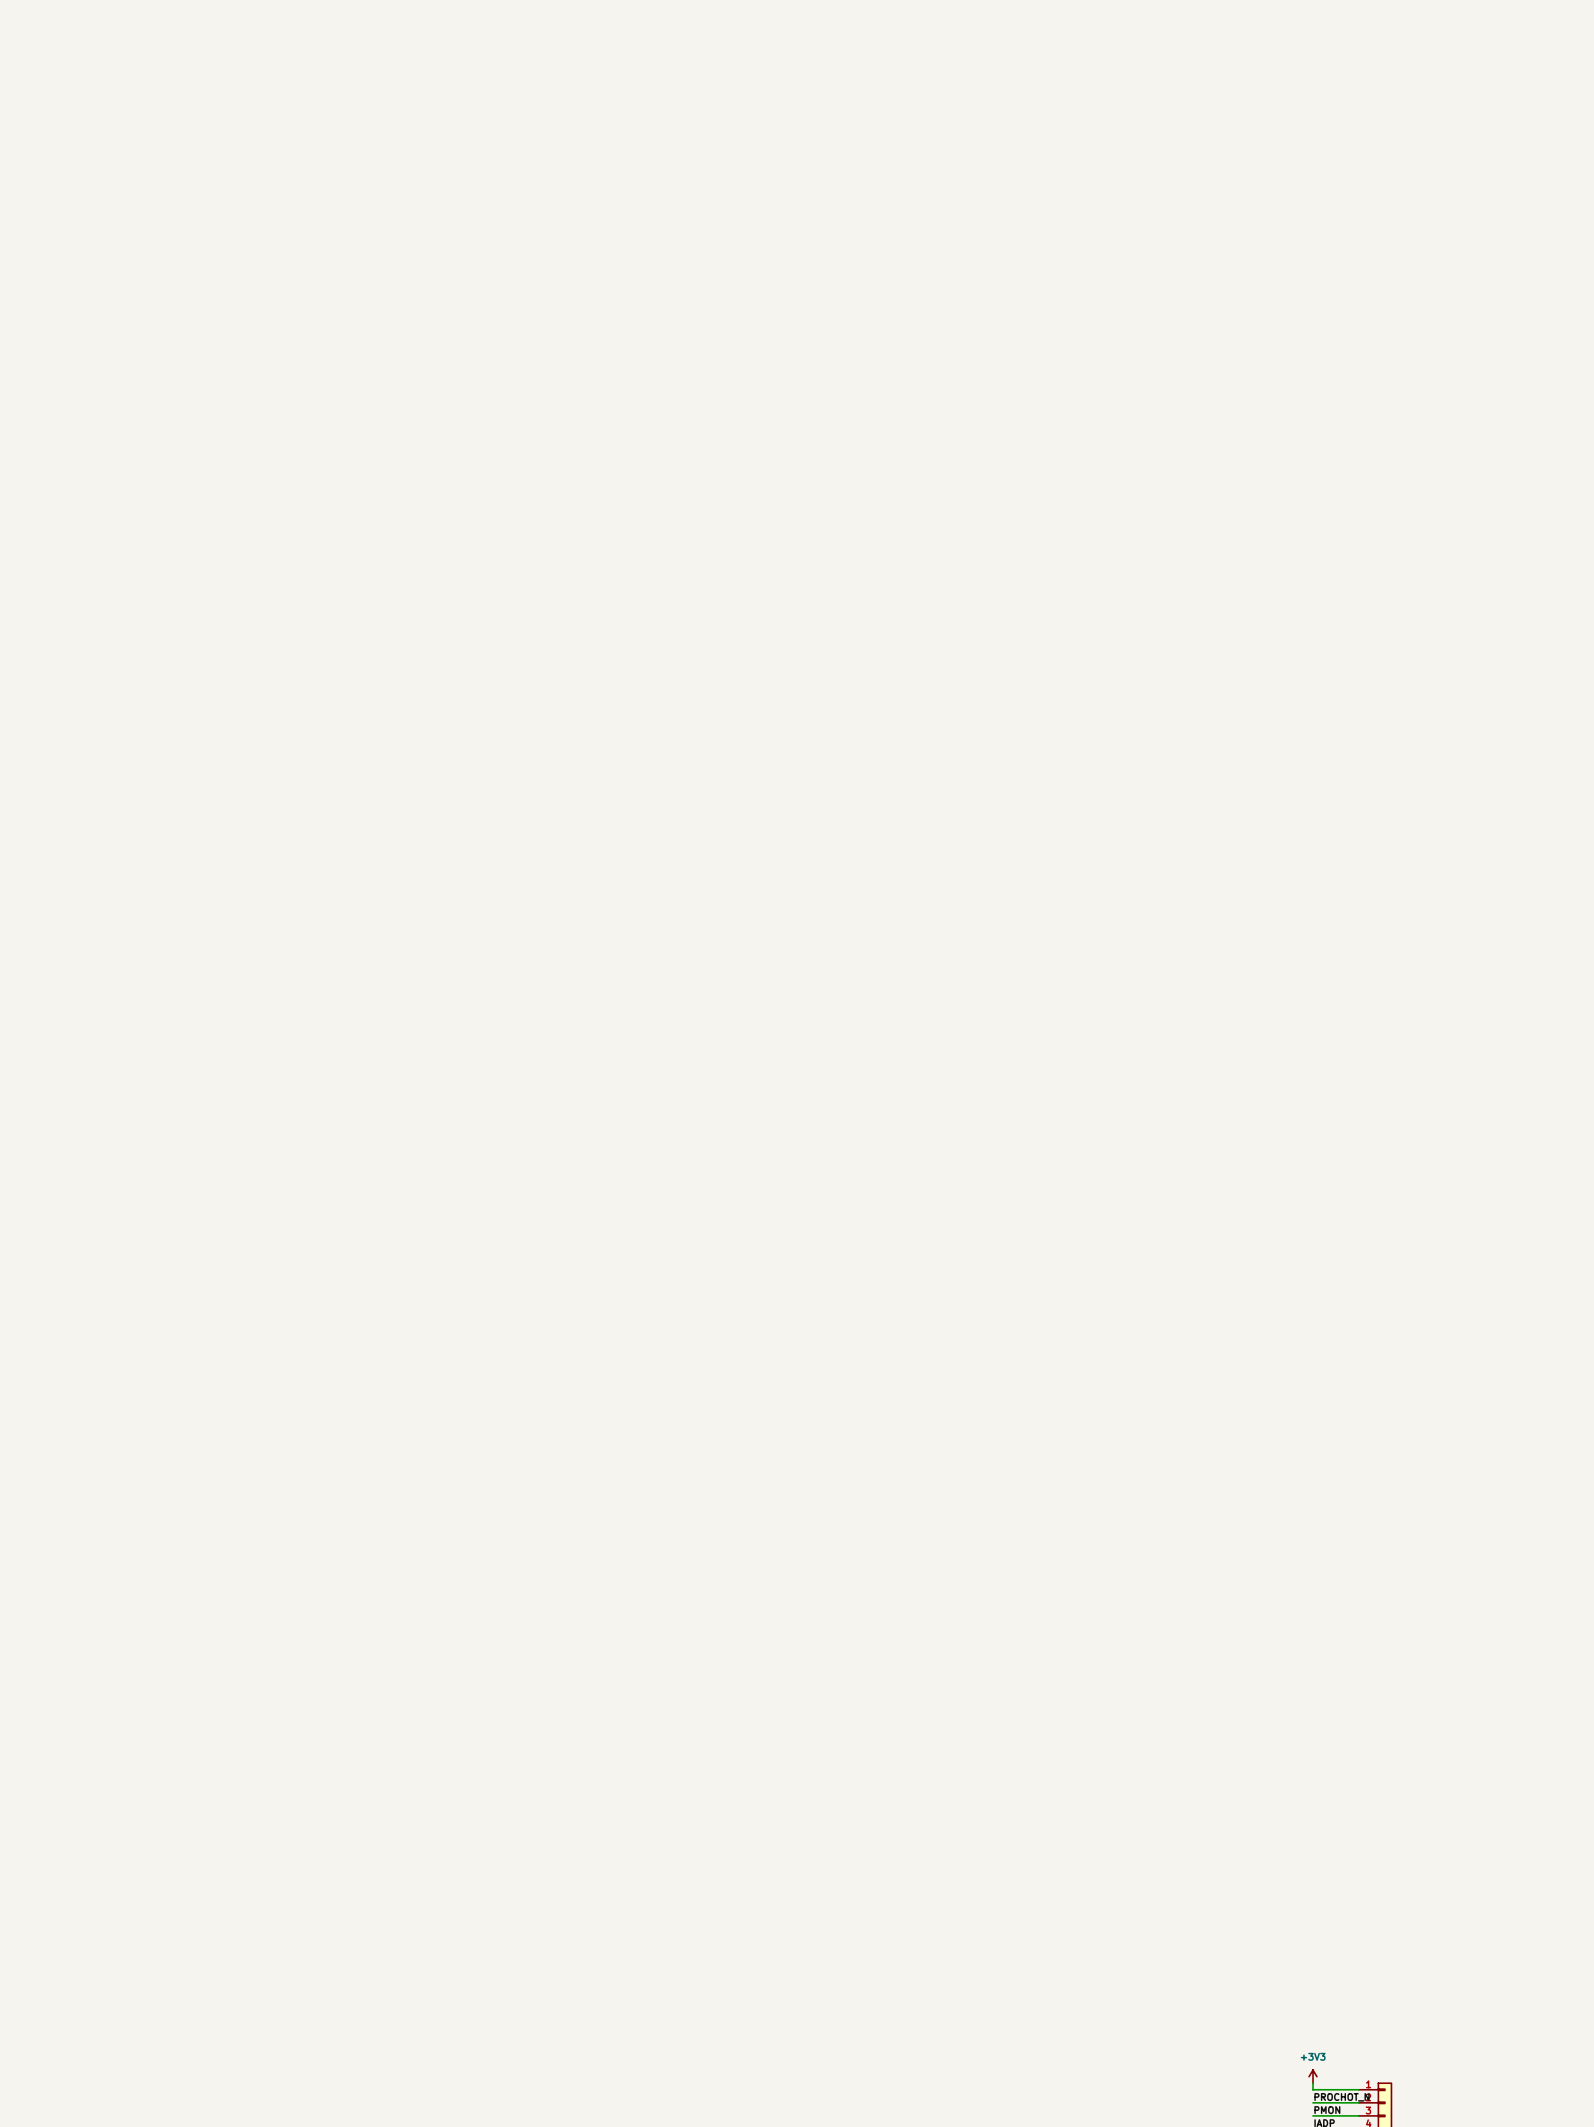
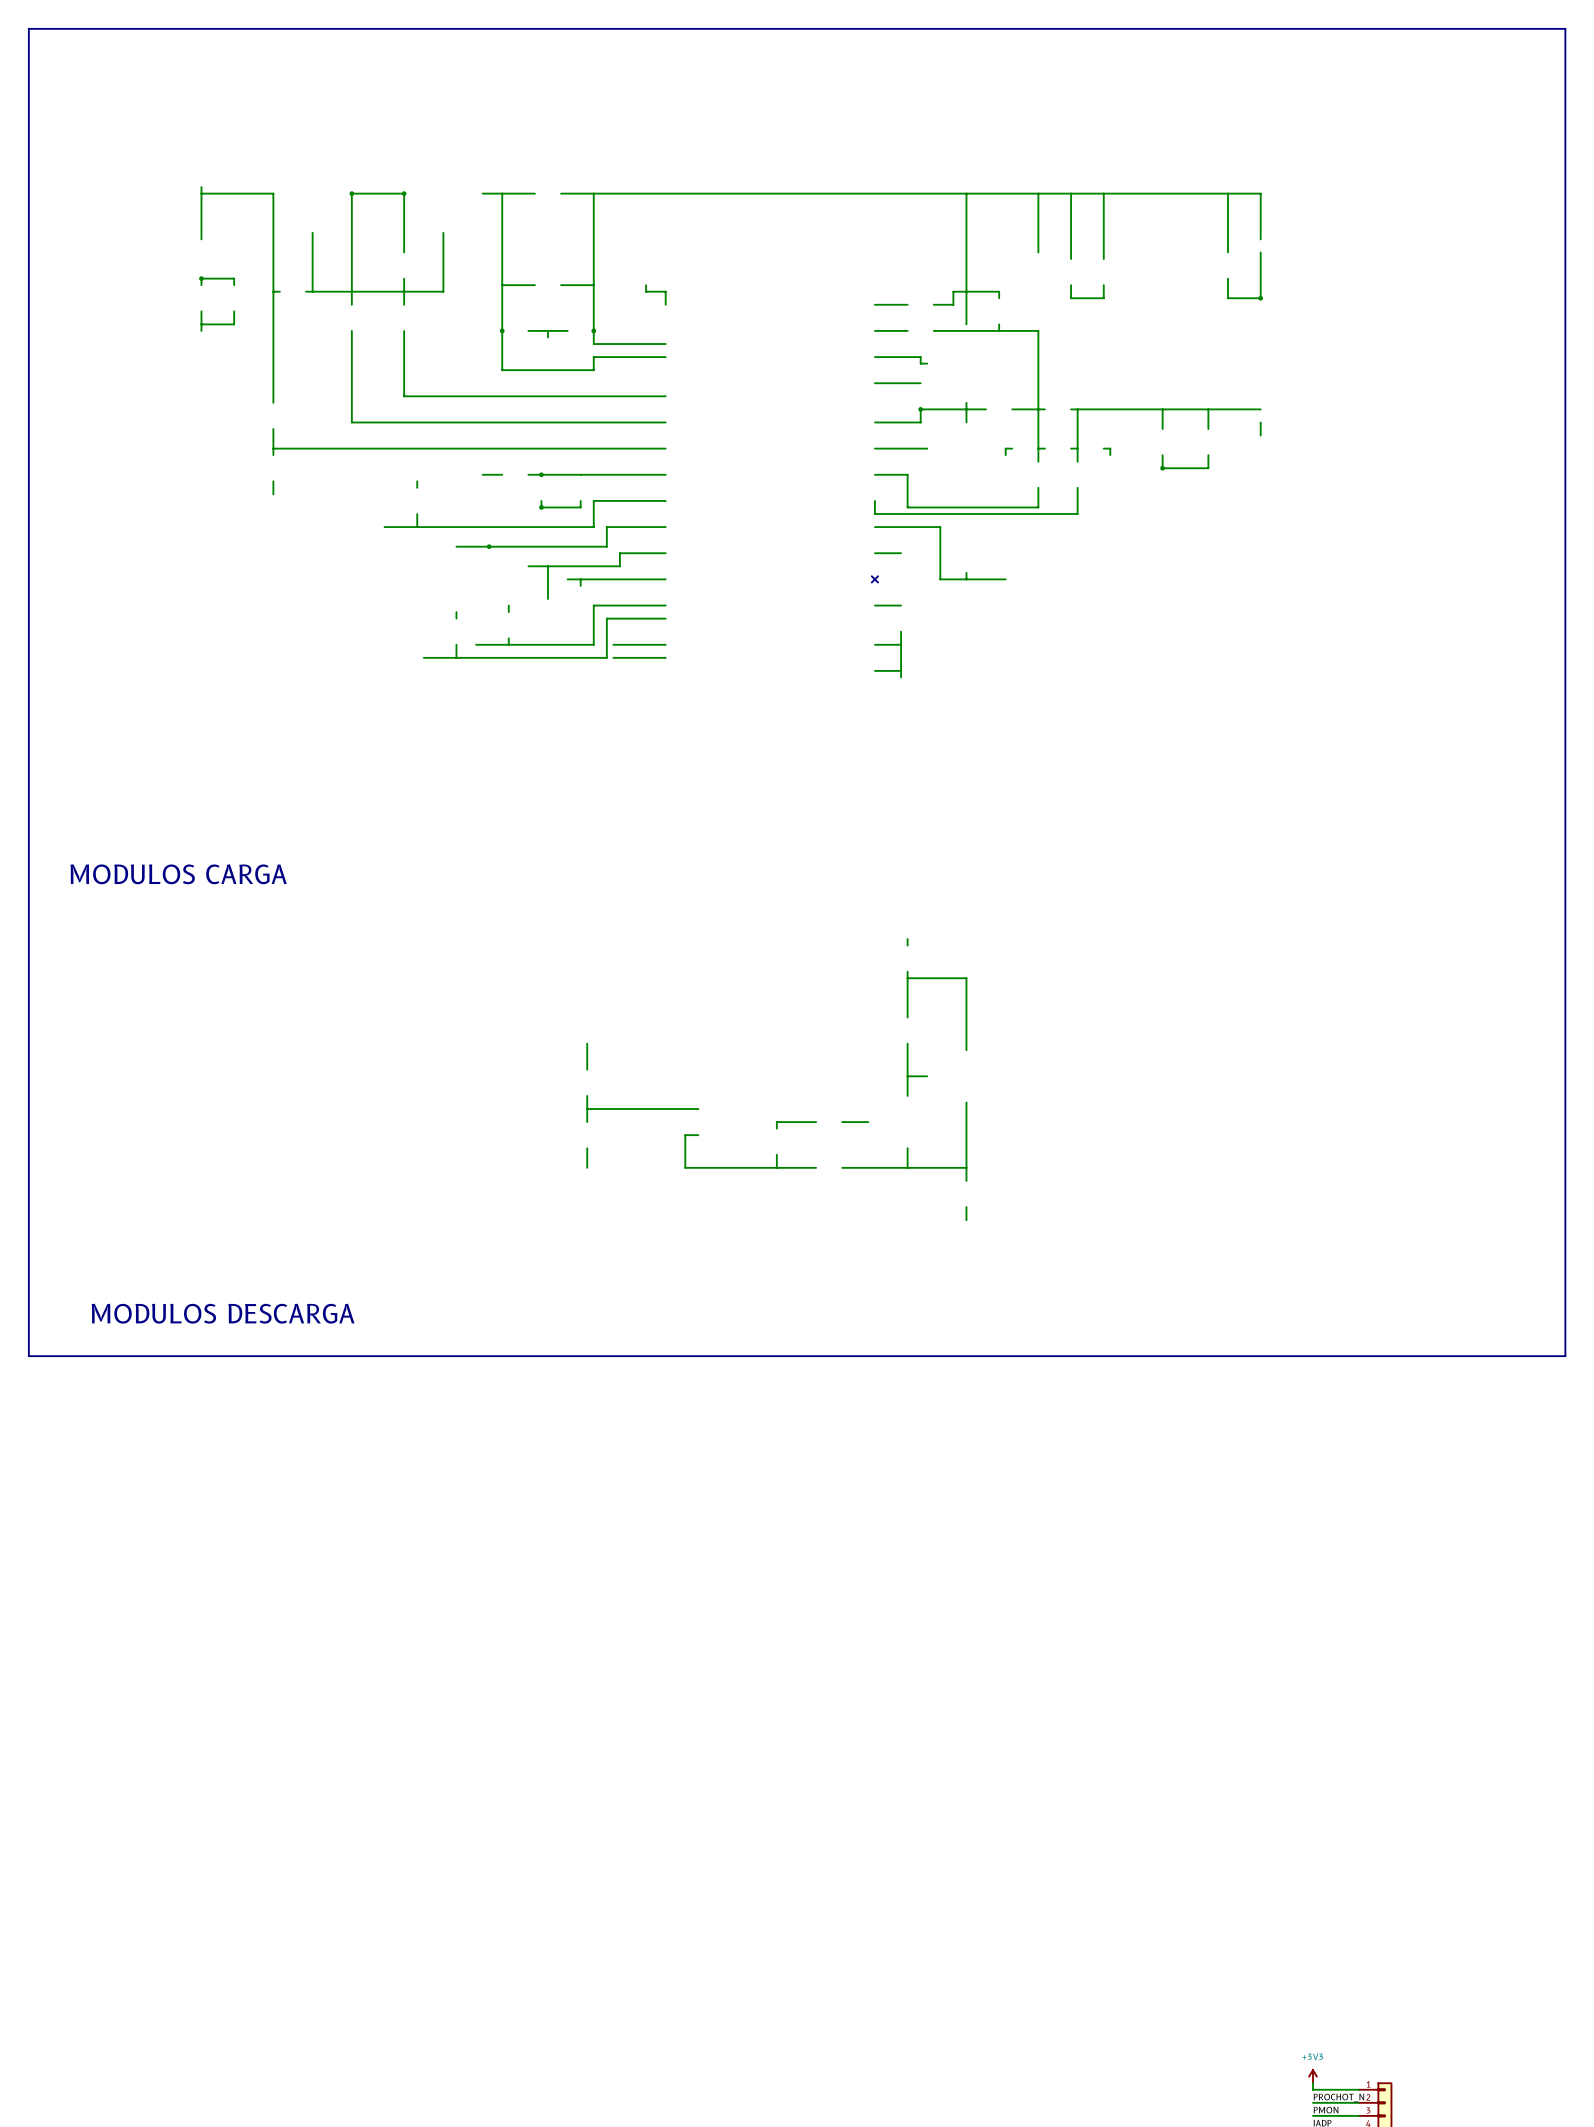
line: none -> (28, 28) (1565, 28) (1565, 1356) (28, 1356) (28, 28)
wire: none -> (201, 187) (201, 239)
wire: none -> (201, 193) (273, 193) (273, 402)
junction: none -> (351, 193)
junction: none -> (404, 193)
wire: none -> (482, 193) (534, 193)
wire: none -> (502, 193) (502, 370) (593, 370) (593, 357) (665, 357)
wire: none -> (561, 193) (1260, 193) (1260, 239)
wire: none -> (593, 193) (593, 344) (665, 344)
wire: none -> (966, 193) (966, 324)
wire: none -> (1038, 193) (1038, 252)
wire: none -> (1071, 193) (1071, 259)
wire: none -> (1103, 193) (1103, 259)
wire: none -> (1228, 193) (1228, 252)
wire: none -> (312, 232) (312, 291)
wire: none -> (443, 232) (443, 291) (306, 291)
wire: none -> (404, 252) (404, 193) (351, 193) (351, 304)
wire: none -> (1260, 252) (1260, 298) (1228, 298) (1228, 278)
junction: none -> (201, 278)
wire: none -> (404, 278) (404, 304)
wire: none -> (201, 285) (201, 278) (234, 278) (234, 285)
wire: none -> (502, 285) (534, 285)
wire: none -> (561, 285) (593, 285)
wire: none -> (646, 285) (646, 291) (665, 291) (665, 304)
wire: none -> (1071, 285) (1071, 298) (1103, 298) (1103, 285)
wire: none -> (273, 291) (279, 291)
wire: none -> (999, 298) (999, 291) (953, 291) (953, 304) (933, 304)
junction: none -> (1260, 298)
wire: none -> (874, 304) (907, 304)
wire: none -> (201, 311) (201, 330)
wire: none -> (234, 311) (234, 324) (201, 324)
wire: none -> (999, 324) (999, 330)
wire: none -> (351, 330) (351, 422) (665, 422)
wire: none -> (404, 330) (404, 396) (665, 396)
junction: none -> (502, 330)
wire: none -> (528, 330) (567, 330)
wire: none -> (548, 330) (548, 337)
junction: none -> (593, 330)
wire: none -> (874, 330) (907, 330)
wire: none -> (933, 330) (1038, 330) (1038, 461)
wire: none -> (874, 357) (920, 357) (920, 363) (927, 363)
wire: none -> (874, 383) (920, 383)
wire: none -> (966, 402) (966, 422)
junction: none -> (920, 409)
wire: none -> (986, 409) (920, 409) (920, 422) (874, 422)
wire: none -> (1012, 409) (1044, 409)
wire: none -> (1071, 409) (1260, 409)
wire: none -> (1077, 409) (1077, 461)
wire: none -> (1162, 409) (1162, 429)
wire: none -> (1208, 409) (1208, 429)
wire: none -> (1260, 422) (1260, 435)
wire: none -> (273, 429) (273, 455)
wire: none -> (273, 448) (665, 448)
wire: none -> (874, 448) (927, 448)
wire: none -> (1012, 448) (1005, 448) (1005, 455)
wire: none -> (1038, 448) (1044, 448)
wire: none -> (1071, 448) (1077, 448)
wire: none -> (1103, 448) (1110, 448) (1110, 455)
wire: none -> (1162, 455) (1162, 468) (1208, 468) (1208, 455)
junction: none -> (1162, 468)
wire: none -> (482, 474) (502, 474)
wire: none -> (528, 474) (665, 474)
junction: none -> (541, 474)
wire: none -> (874, 474) (907, 474) (907, 507) (1038, 507) (1038, 487)
wire: none -> (273, 481) (273, 494)
wire: none -> (417, 481) (417, 487)
wire: none -> (1077, 487) (1077, 514) (874, 514) (874, 500)
wire: none -> (541, 500) (541, 507) (580, 507) (580, 500)
wire: none -> (665, 500) (593, 500) (593, 527) (384, 527)
junction: none -> (541, 507)
wire: none -> (417, 514) (417, 527)
wire: none -> (665, 527) (606, 527) (606, 546) (456, 546)
wire: none -> (874, 527) (940, 527) (940, 579) (1005, 579)
junction: none -> (489, 546)
wire: none -> (665, 553) (619, 553) (619, 566) (528, 566)
wire: none -> (874, 553) (901, 553)
wire: none -> (548, 566) (548, 599)
wire: none -> (966, 572) (966, 579)
wire: none -> (567, 579) (665, 579)
wire: none -> (580, 579) (580, 585)
no-connect mark: none -> (874, 579)
wire: none -> (508, 605) (508, 612)
wire: none -> (665, 605) (593, 605) (593, 644) (476, 644)
wire: none -> (874, 605) (901, 605)
wire: none -> (456, 612) (456, 618)
wire: none -> (665, 618) (606, 618) (606, 657) (423, 657)
wire: none -> (901, 631) (901, 677)
wire: none -> (508, 638) (508, 644)
wire: none -> (456, 644) (456, 657)
wire: none -> (613, 644) (665, 644)
wire: none -> (874, 644) (901, 644)
wire: none -> (613, 657) (665, 657)
wire: none -> (874, 670) (901, 670)
text: none -> MODULOS CARGA (178, 874)
wire: none -> (907, 939) (907, 945)
wire: none -> (907, 971) (907, 1017)
wire: none -> (907, 978) (966, 978) (966, 1050)
wire: none -> (587, 1043) (587, 1069)
wire: none -> (907, 1043) (907, 1095)
wire: none -> (907, 1076) (927, 1076)
wire: none -> (587, 1095) (587, 1122)
wire: none -> (966, 1102) (966, 1180)
wire: none -> (587, 1109) (698, 1109)
wire: none -> (816, 1122) (776, 1122) (776, 1128)
wire: none -> (842, 1122) (868, 1122)
wire: none -> (698, 1135) (685, 1135) (685, 1167) (816, 1167)
wire: none -> (587, 1148) (587, 1167)
wire: none -> (907, 1148) (907, 1167)
wire: none -> (776, 1154) (776, 1167)
wire: none -> (842, 1167) (966, 1167)
wire: none -> (966, 1207) (966, 1220)
text: none -> MODULOS DESCARGA (223, 1313)

